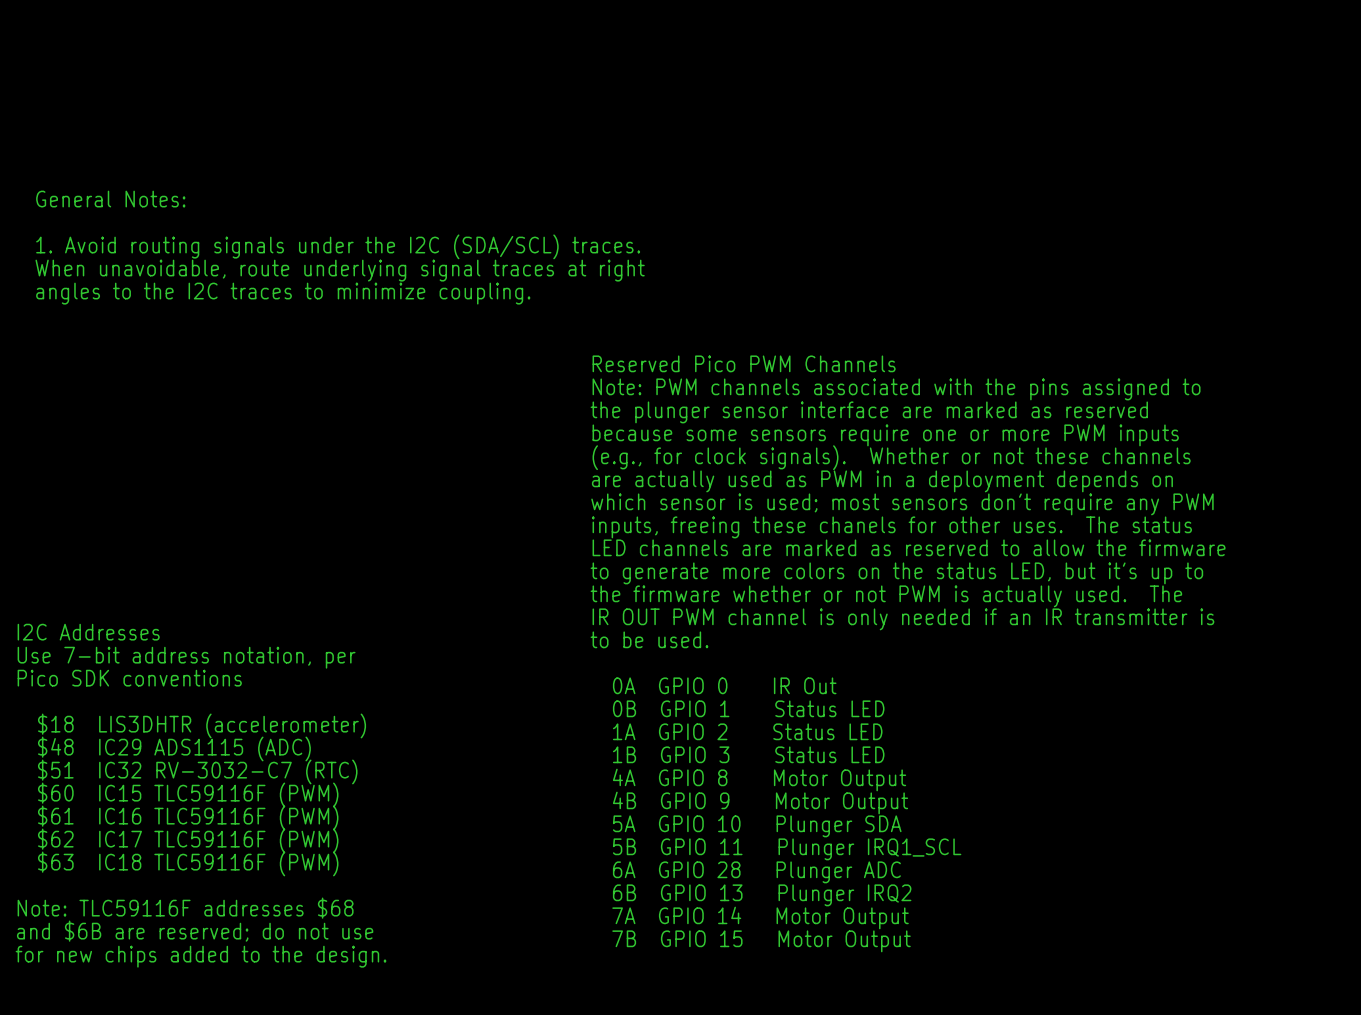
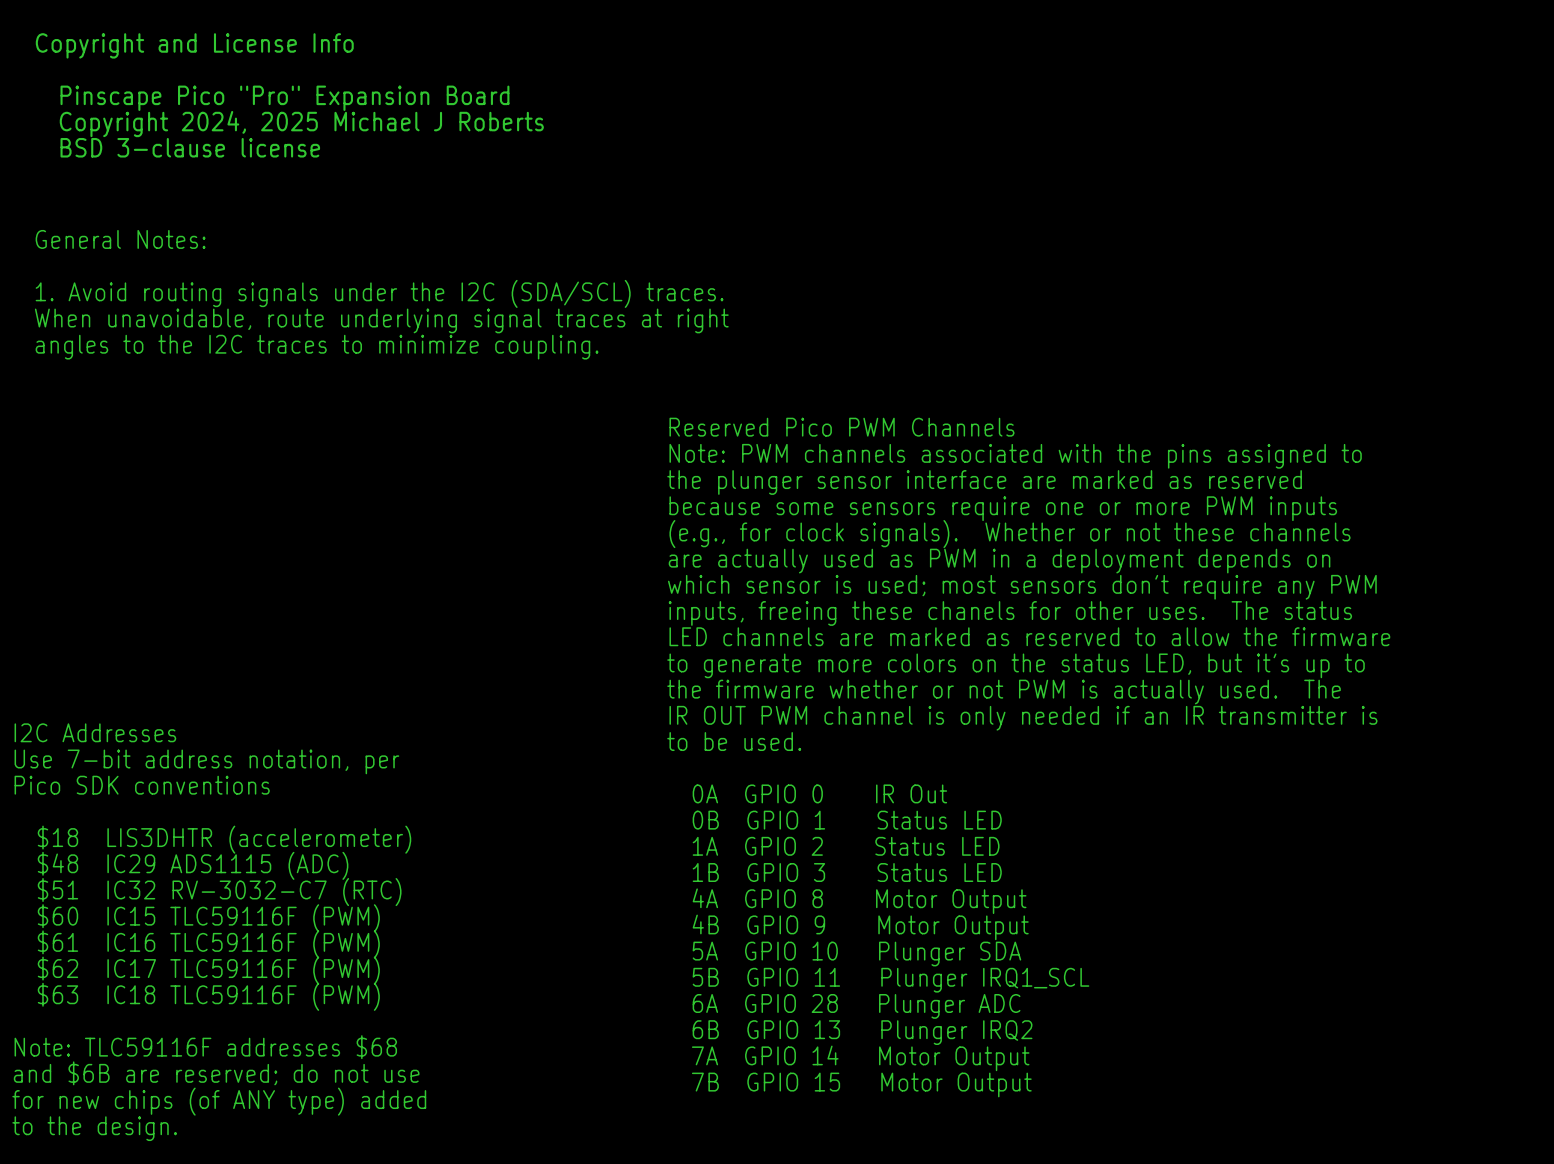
text: none -> Copyright and License Info (194, 45)
text: none -> Pinscape Pico "Pro" Expansion Board (284, 98)
text: none -> Copyright 2024, 2025 Michael J Roberts (301, 124)
text: none -> BSD 3-clause license (190, 147)
text: for new chips added to the design. (201, 956) -> for new chips (of ANY type) added (219, 1101)
text: none -> to the design. (94, 1128)

